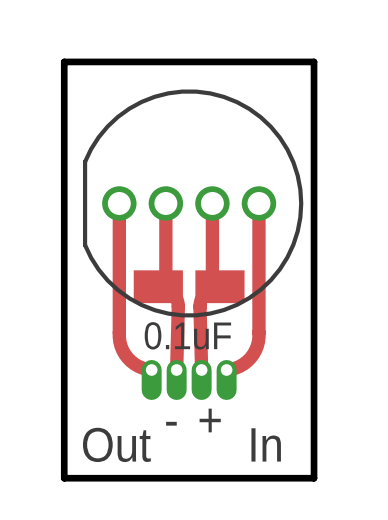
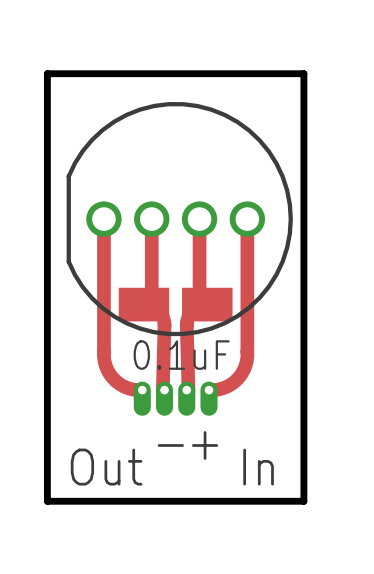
part footprint: [141, 360, 237, 400] -> [133, 381, 218, 416]

